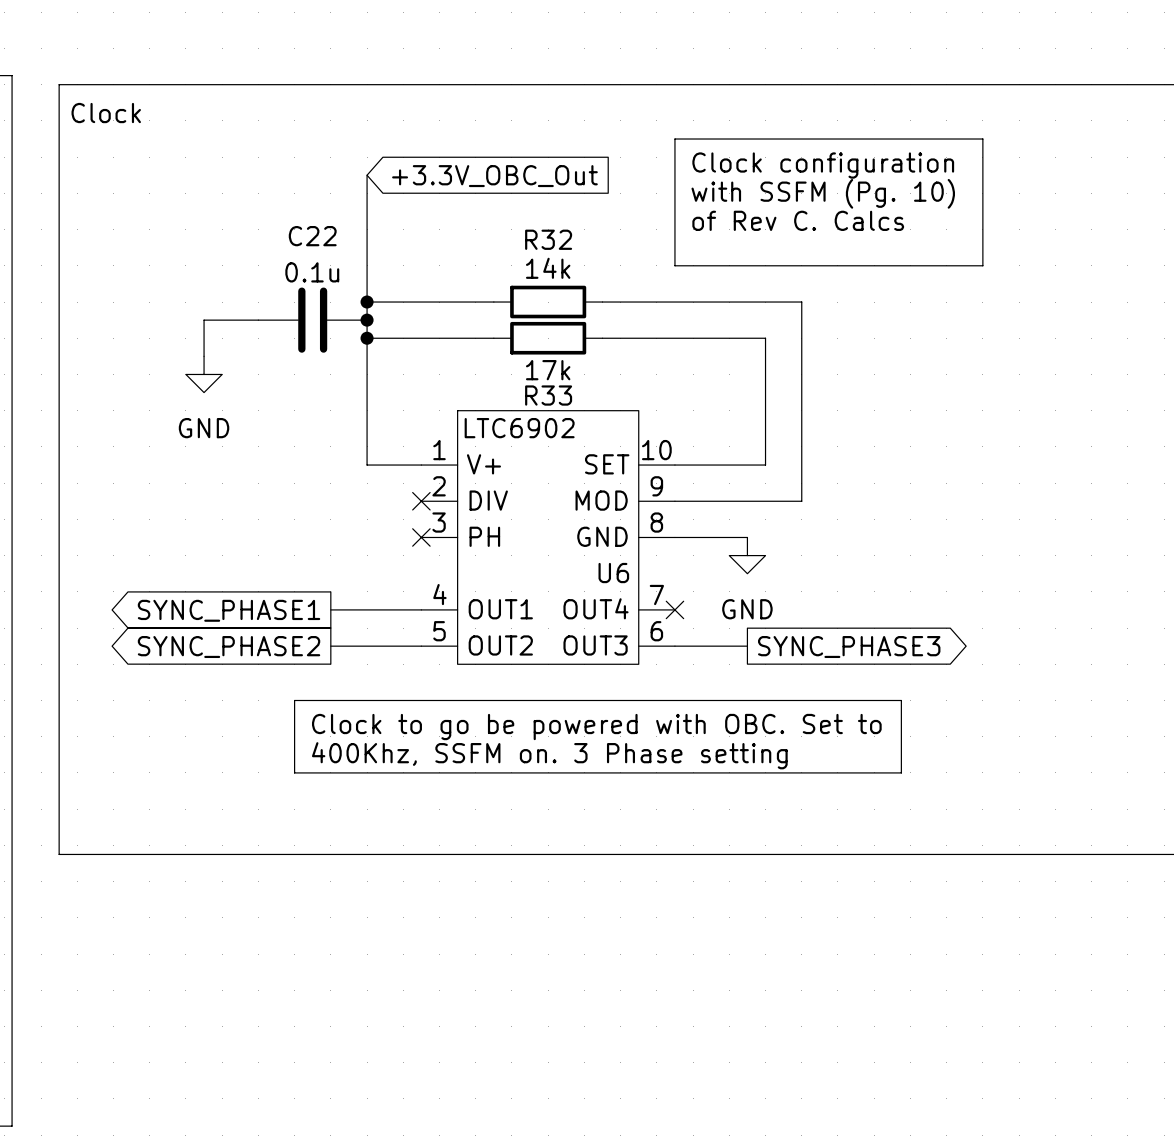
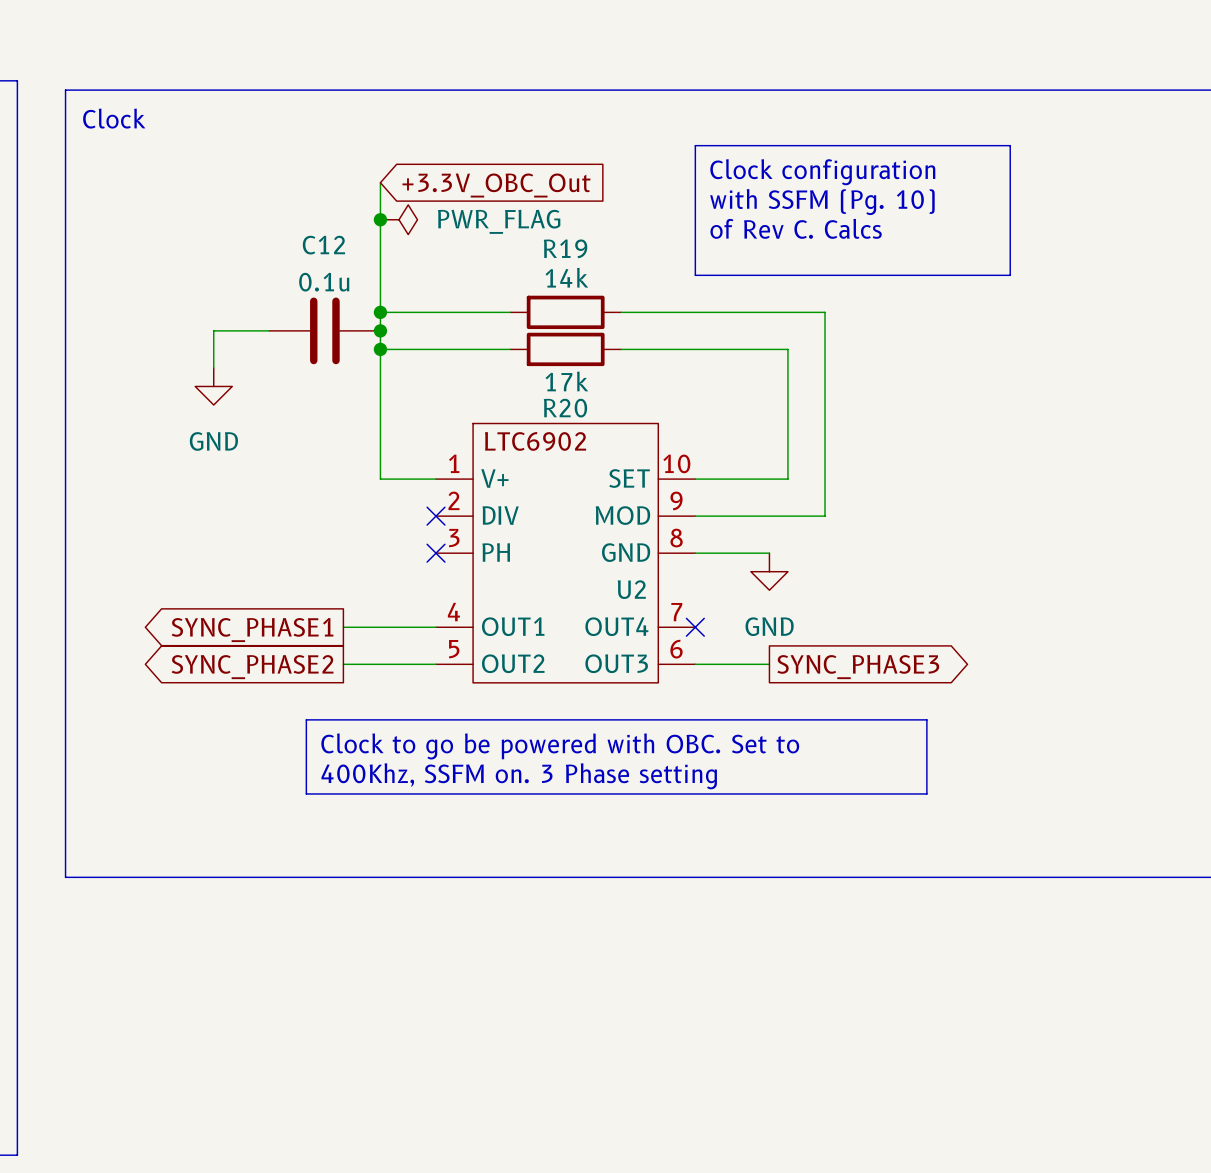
junction: none -> (380, 219)
power symbol: none -> PWR_FLAG (398, 219)
C22 name: C22 (312, 236) -> C12 (323, 245)
R32 name: R32 (548, 239) -> R19 (565, 248)
R33 name: R33 (548, 395) -> R20 (565, 408)
U6 name: U6 (613, 573) -> U2 (631, 589)

